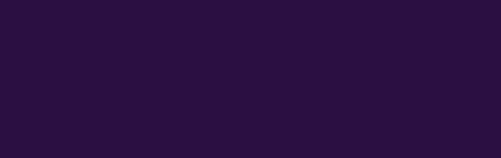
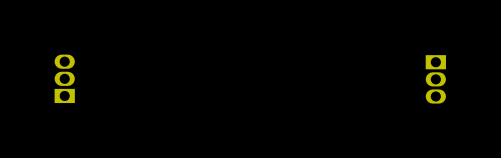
part: none -> (64, 78)
part: none -> (435, 79)

